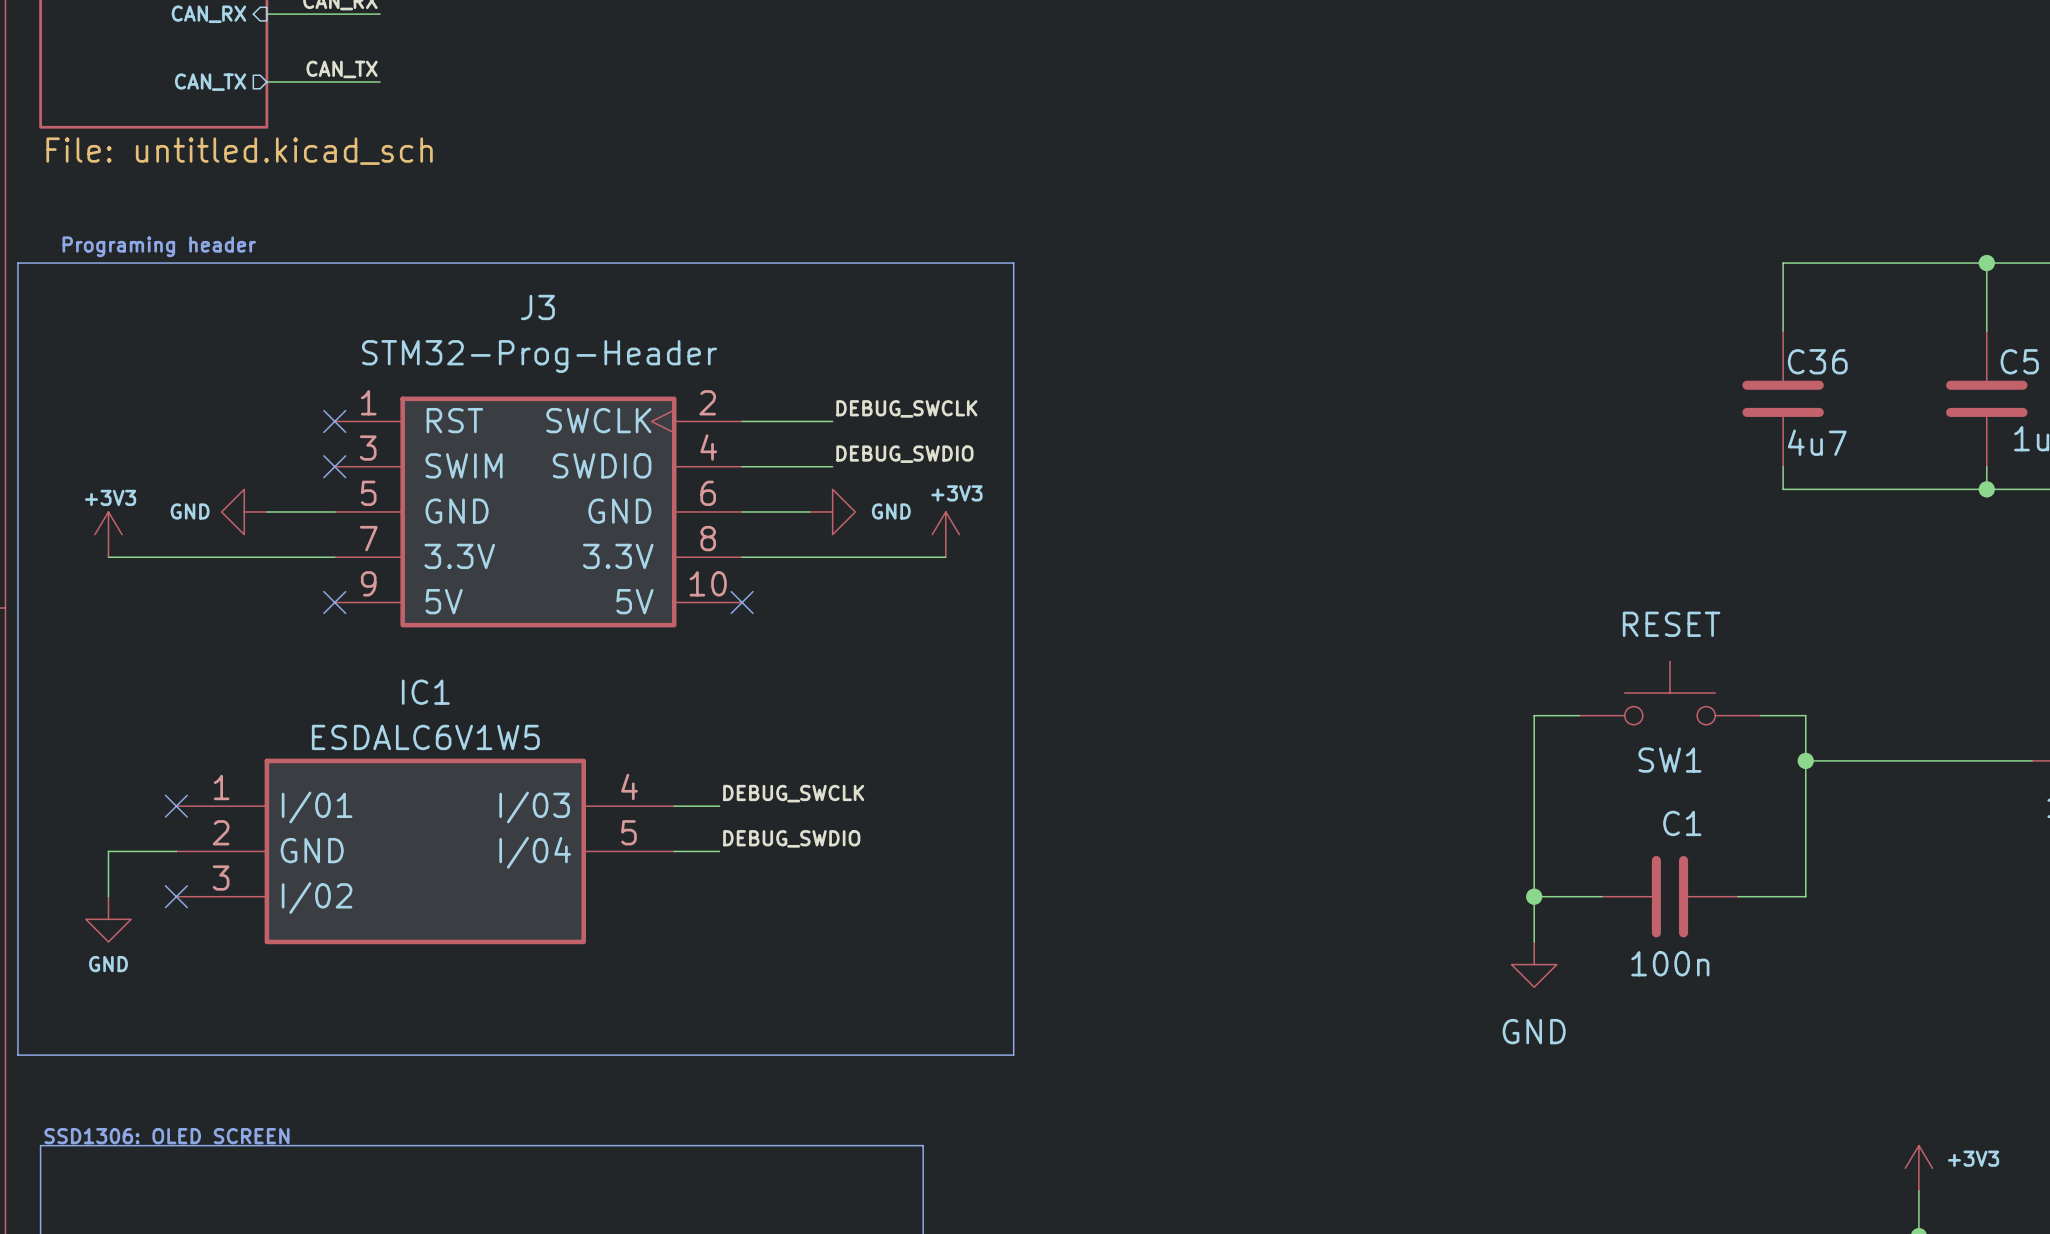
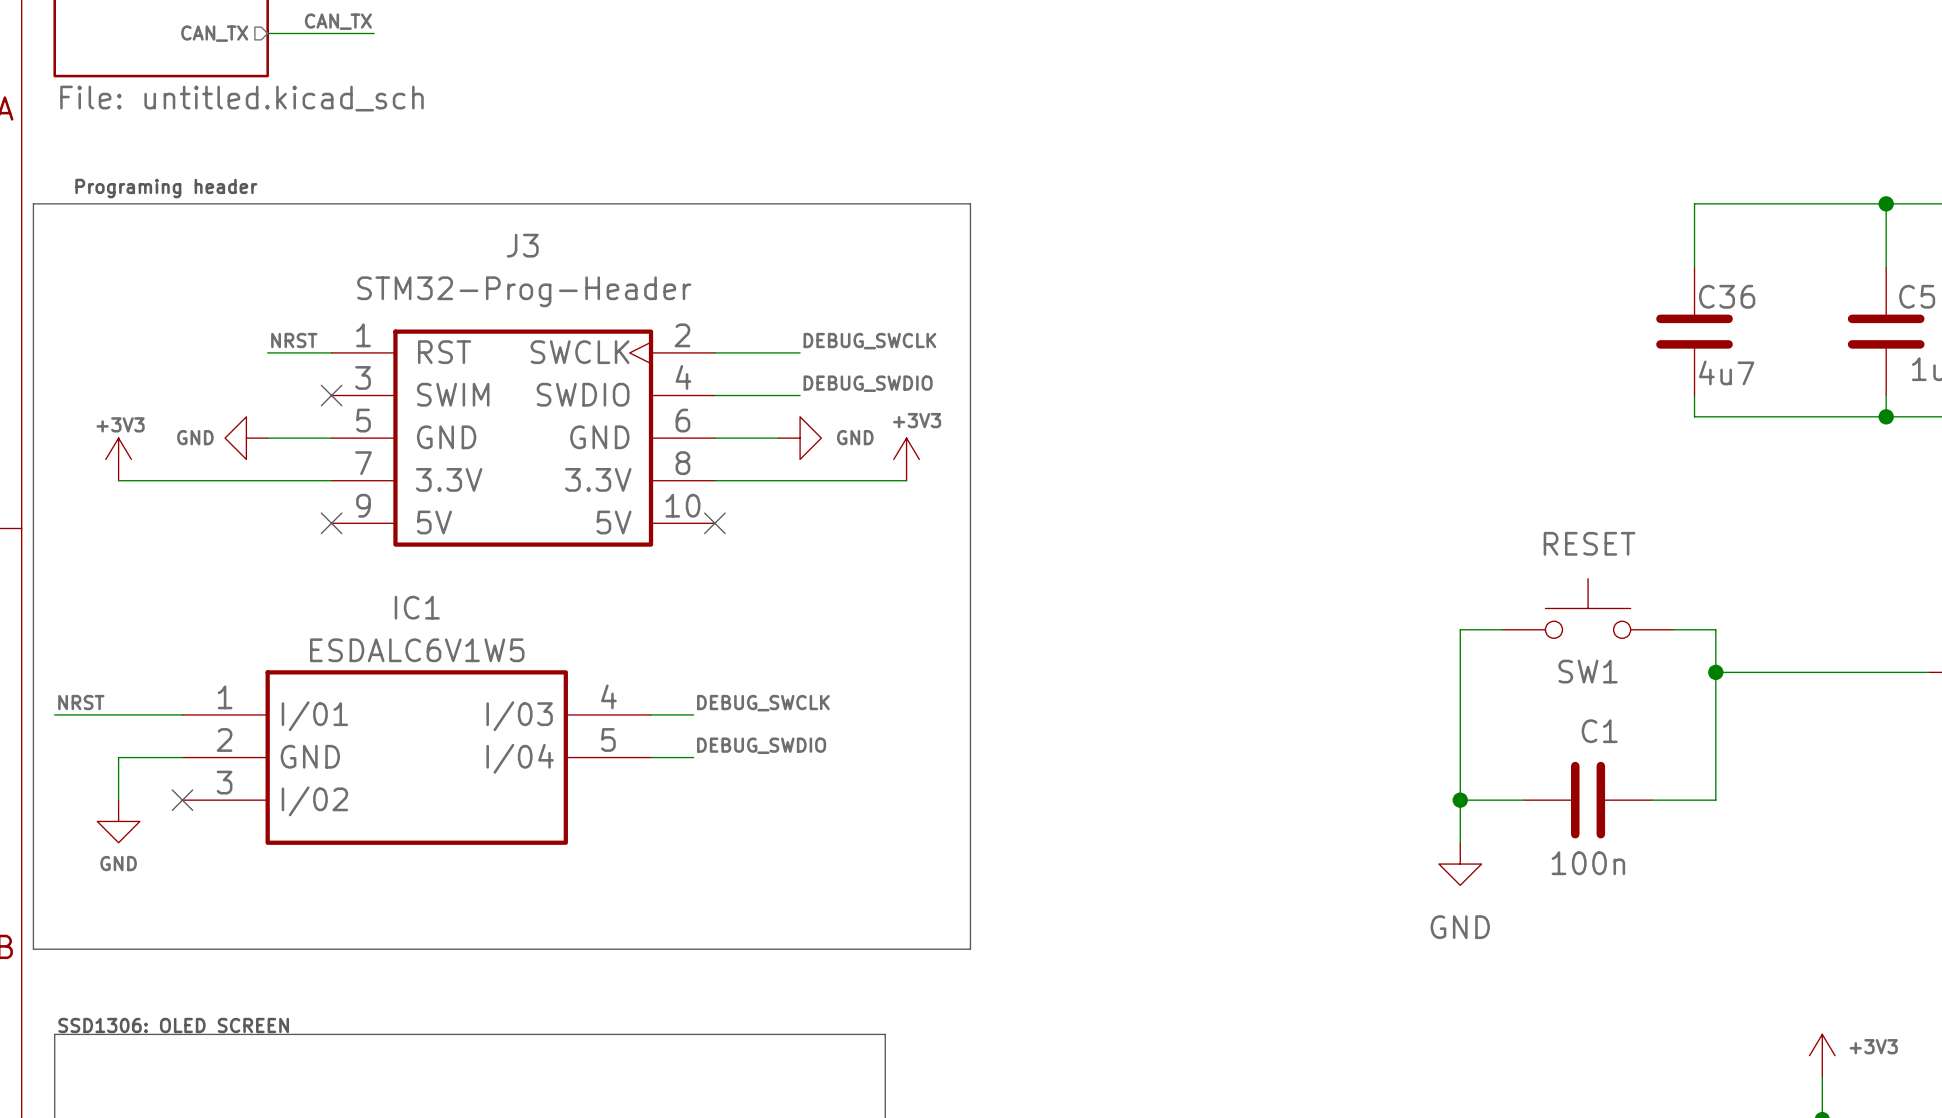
label: none -> NRST (294, 340)
wire: none -> (267, 352) (331, 352)
no-connect mark: (334, 421) -> none
label: none -> NRST (81, 702)
wire: none -> (54, 714) (182, 714)
no-connect mark: (176, 806) -> none

